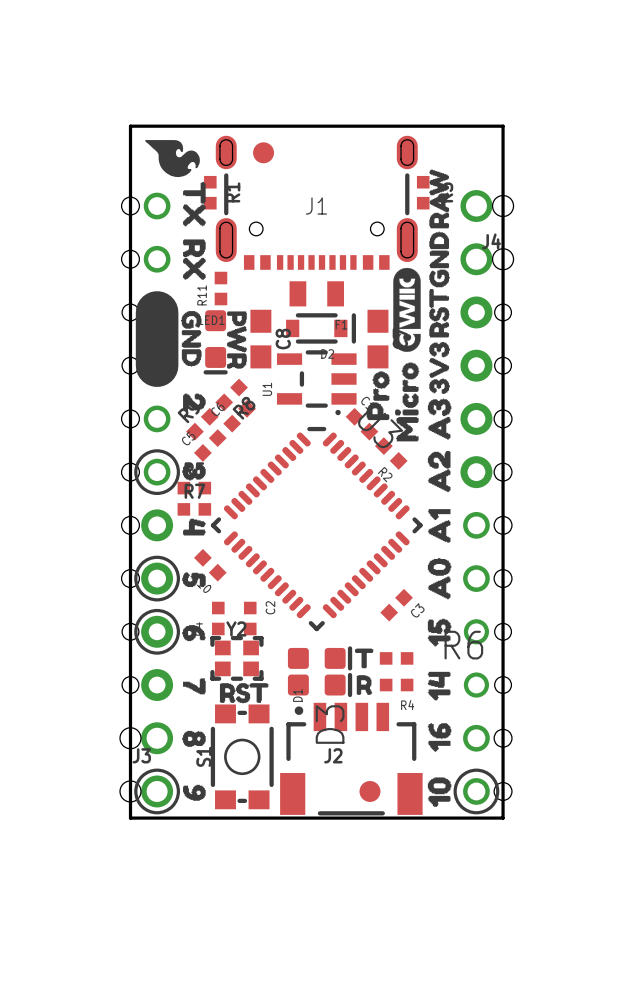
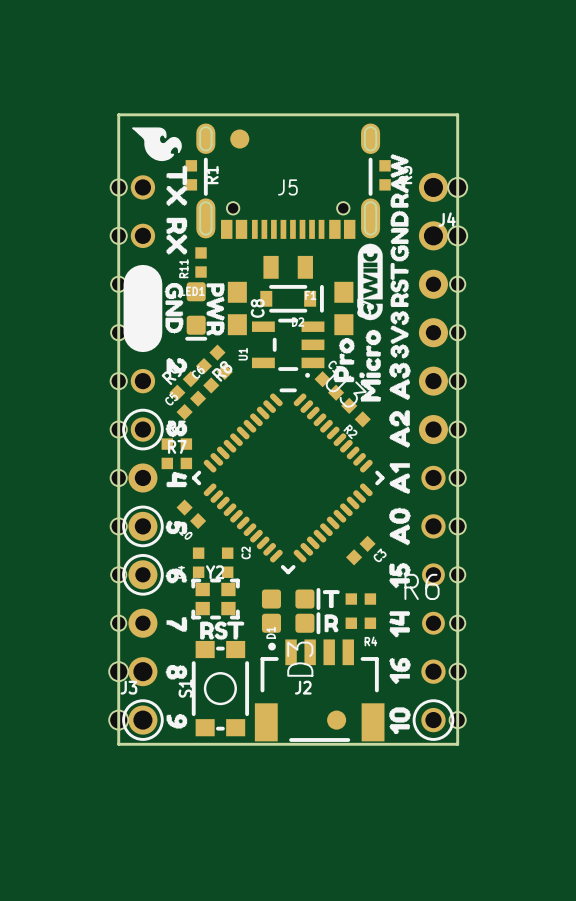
J5: none -> (288, 181)
J1: (316, 202) -> none

